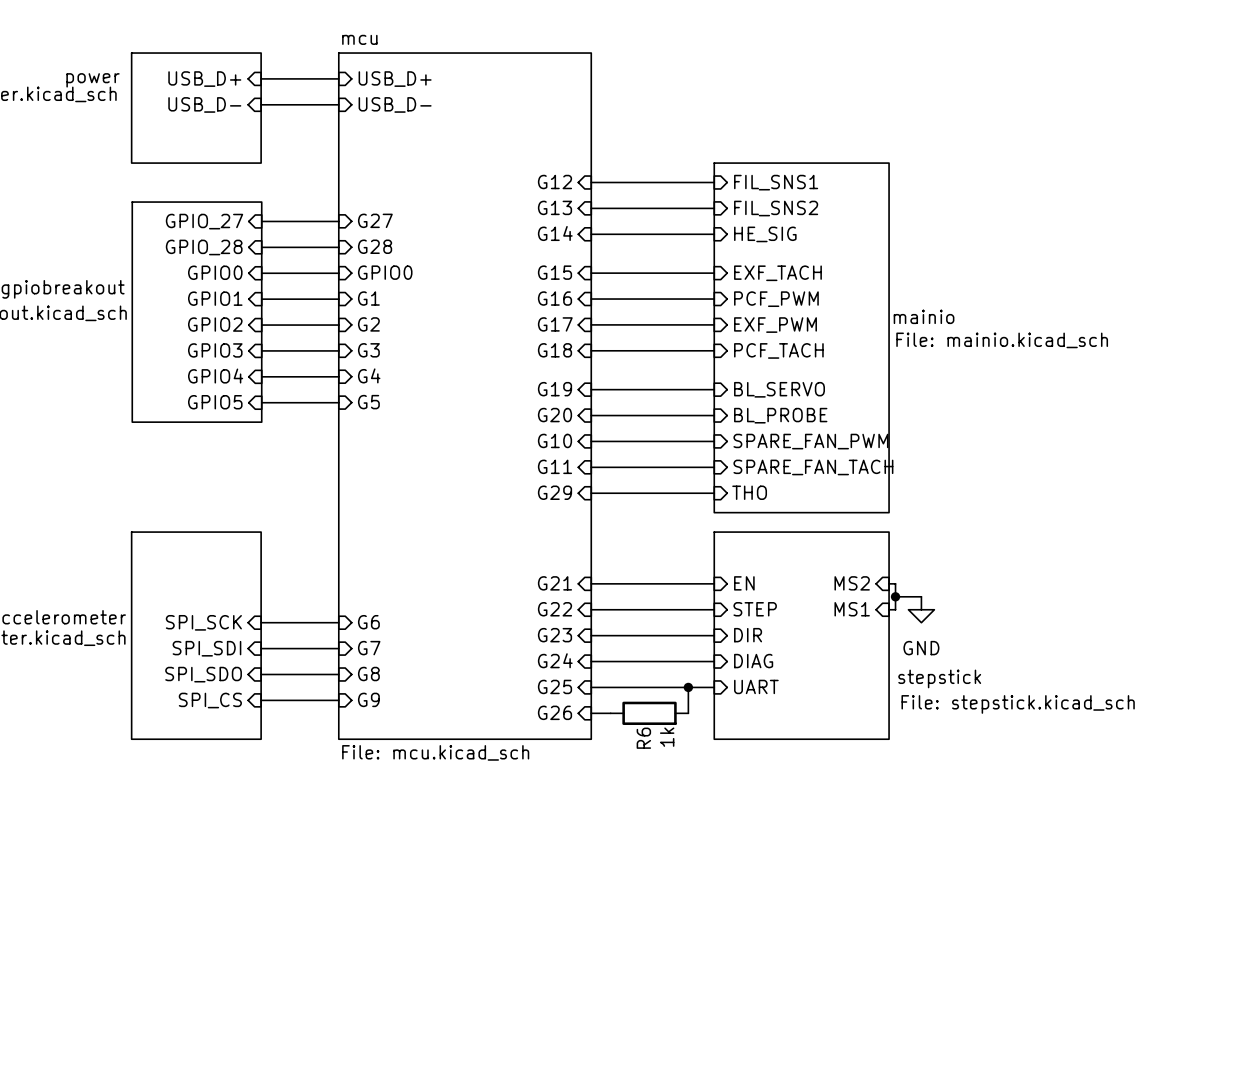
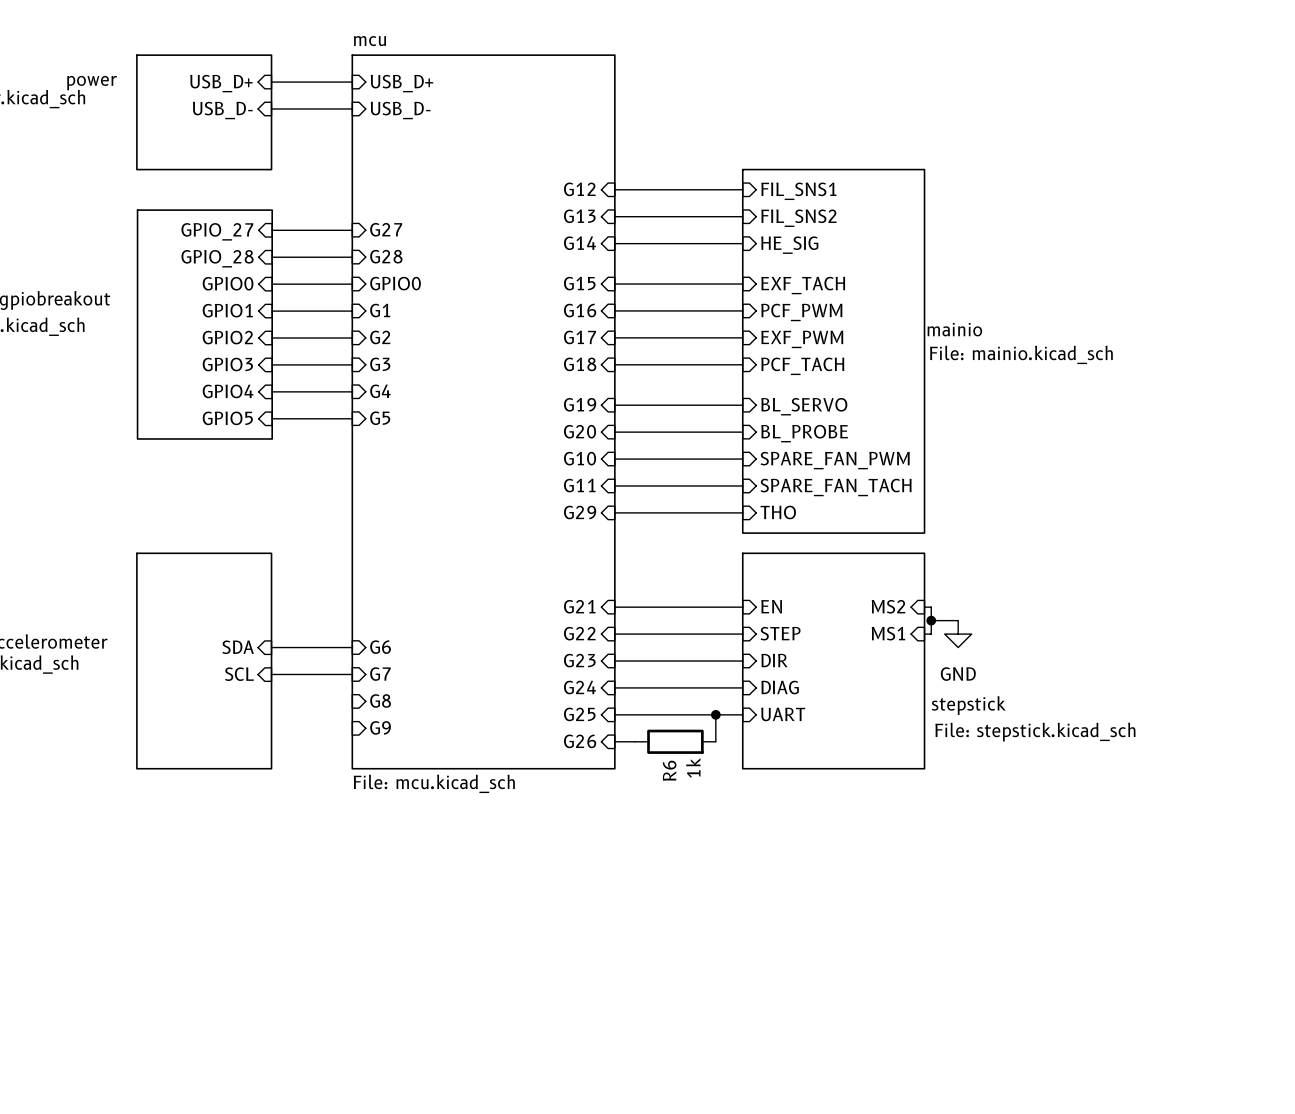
sheet pin: SPI_SCK (203, 622) -> SDA (238, 647)
sheet pin: SPI_SDI (206, 648) -> SCL (239, 674)
sheet pin: SPI_SDO (203, 674) -> none
wire: (261, 674) (338, 674) -> none
sheet pin: SPI_CS (210, 700) -> none
wire: (261, 700) (338, 700) -> none

